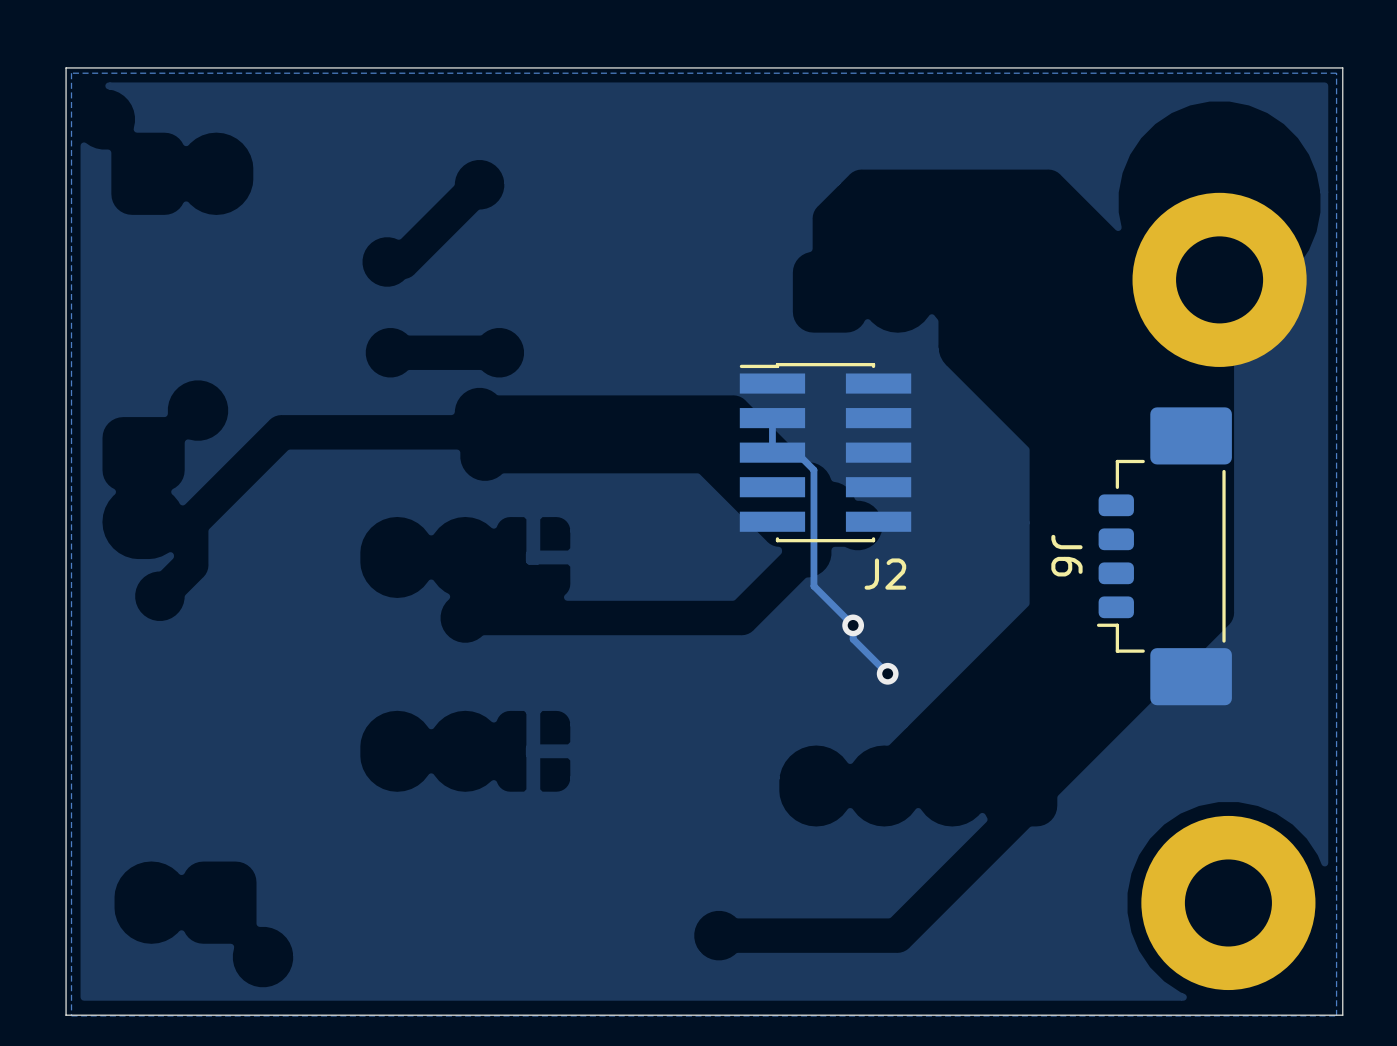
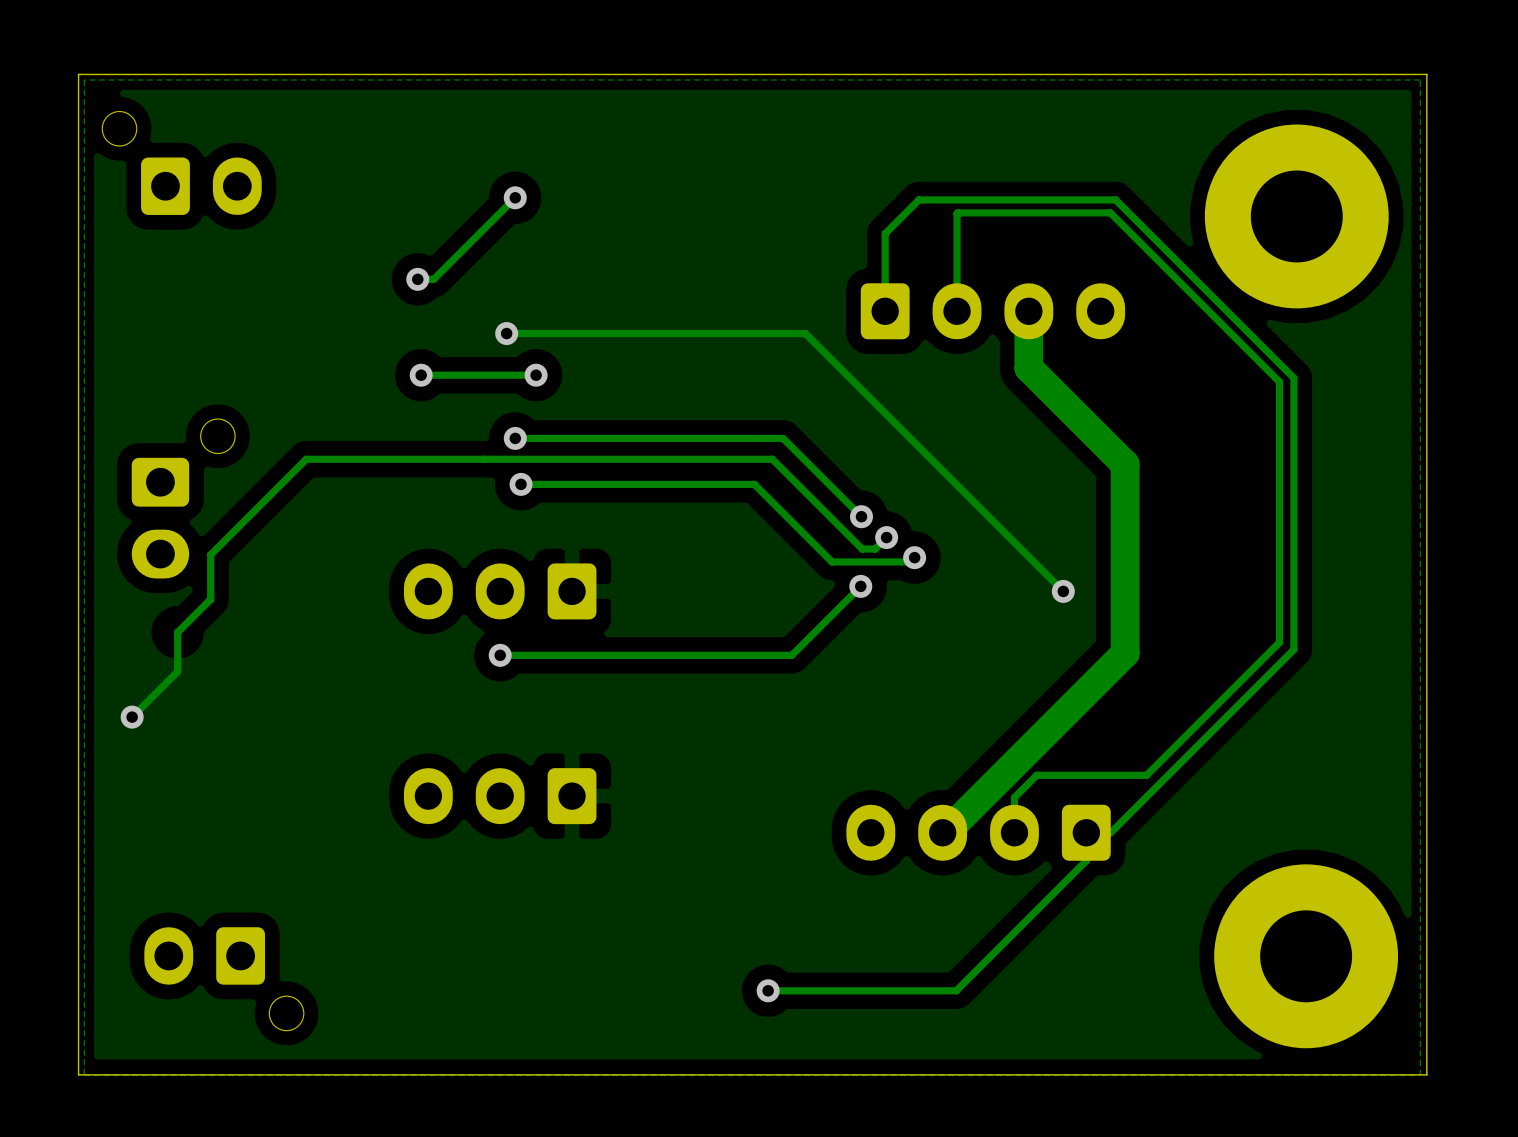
part: none -> (182, 163)
track: none -> (515, 197) (433, 279) (417, 279)
via: none -> (515, 197)
via: none -> (417, 279)
part position: (1219, 279) -> (1296, 216)
track: none -> (885, 311) (885, 233) (918, 199) (1115, 199) (1293, 378) (1293, 649) (1110, 832) (1086, 832) (1086, 860) (956, 990) (768, 990)
track: none -> (957, 311) (957, 212) (1110, 212) (1279, 382) (1279, 642) (1146, 775) (1036, 775) (1014, 797) (1014, 832)
part: none -> (992, 311)
track: none -> (1028, 311) (1028, 368) (1125, 464) (1125, 653) (945, 832) (942, 832)
track: none -> (506, 333) (805, 333) (1063, 591)
via: none -> (506, 333)
via: none -> (421, 375)
track: none -> (536, 375) (421, 375)
via: none -> (536, 375)
track: none -> (515, 438) (783, 438) (861, 516)
via: none -> (515, 438)
track: (772, 418) (772, 452) (796, 452) (813, 470) (813, 586) (853, 625) (853, 639) (887, 673) -> none
J2: (825, 452) -> none
track: none -> (521, 484) (754, 484) (832, 561) (910, 561) (914, 557)
via: none -> (521, 484)
part: none -> (183, 498)
via: none -> (861, 516)
track: none -> (886, 537) (875, 549) (862, 549) (772, 459) (306, 459) (210, 554) (210, 599) (177, 632) (177, 671) (132, 717)
via: none -> (886, 537)
via: none -> (914, 557)
track: none -> (860, 586) (791, 655) (500, 655)
via: none -> (860, 586)
J6: (1164, 556) -> none
part: none -> (500, 591)
via: none -> (1063, 591)
via: none -> (500, 655)
via: (853, 625) -> none
via: (887, 673) -> none
via: none -> (132, 717)
part: none -> (500, 796)
part: none -> (978, 832)
part: none -> (224, 978)
via: none -> (768, 990)

